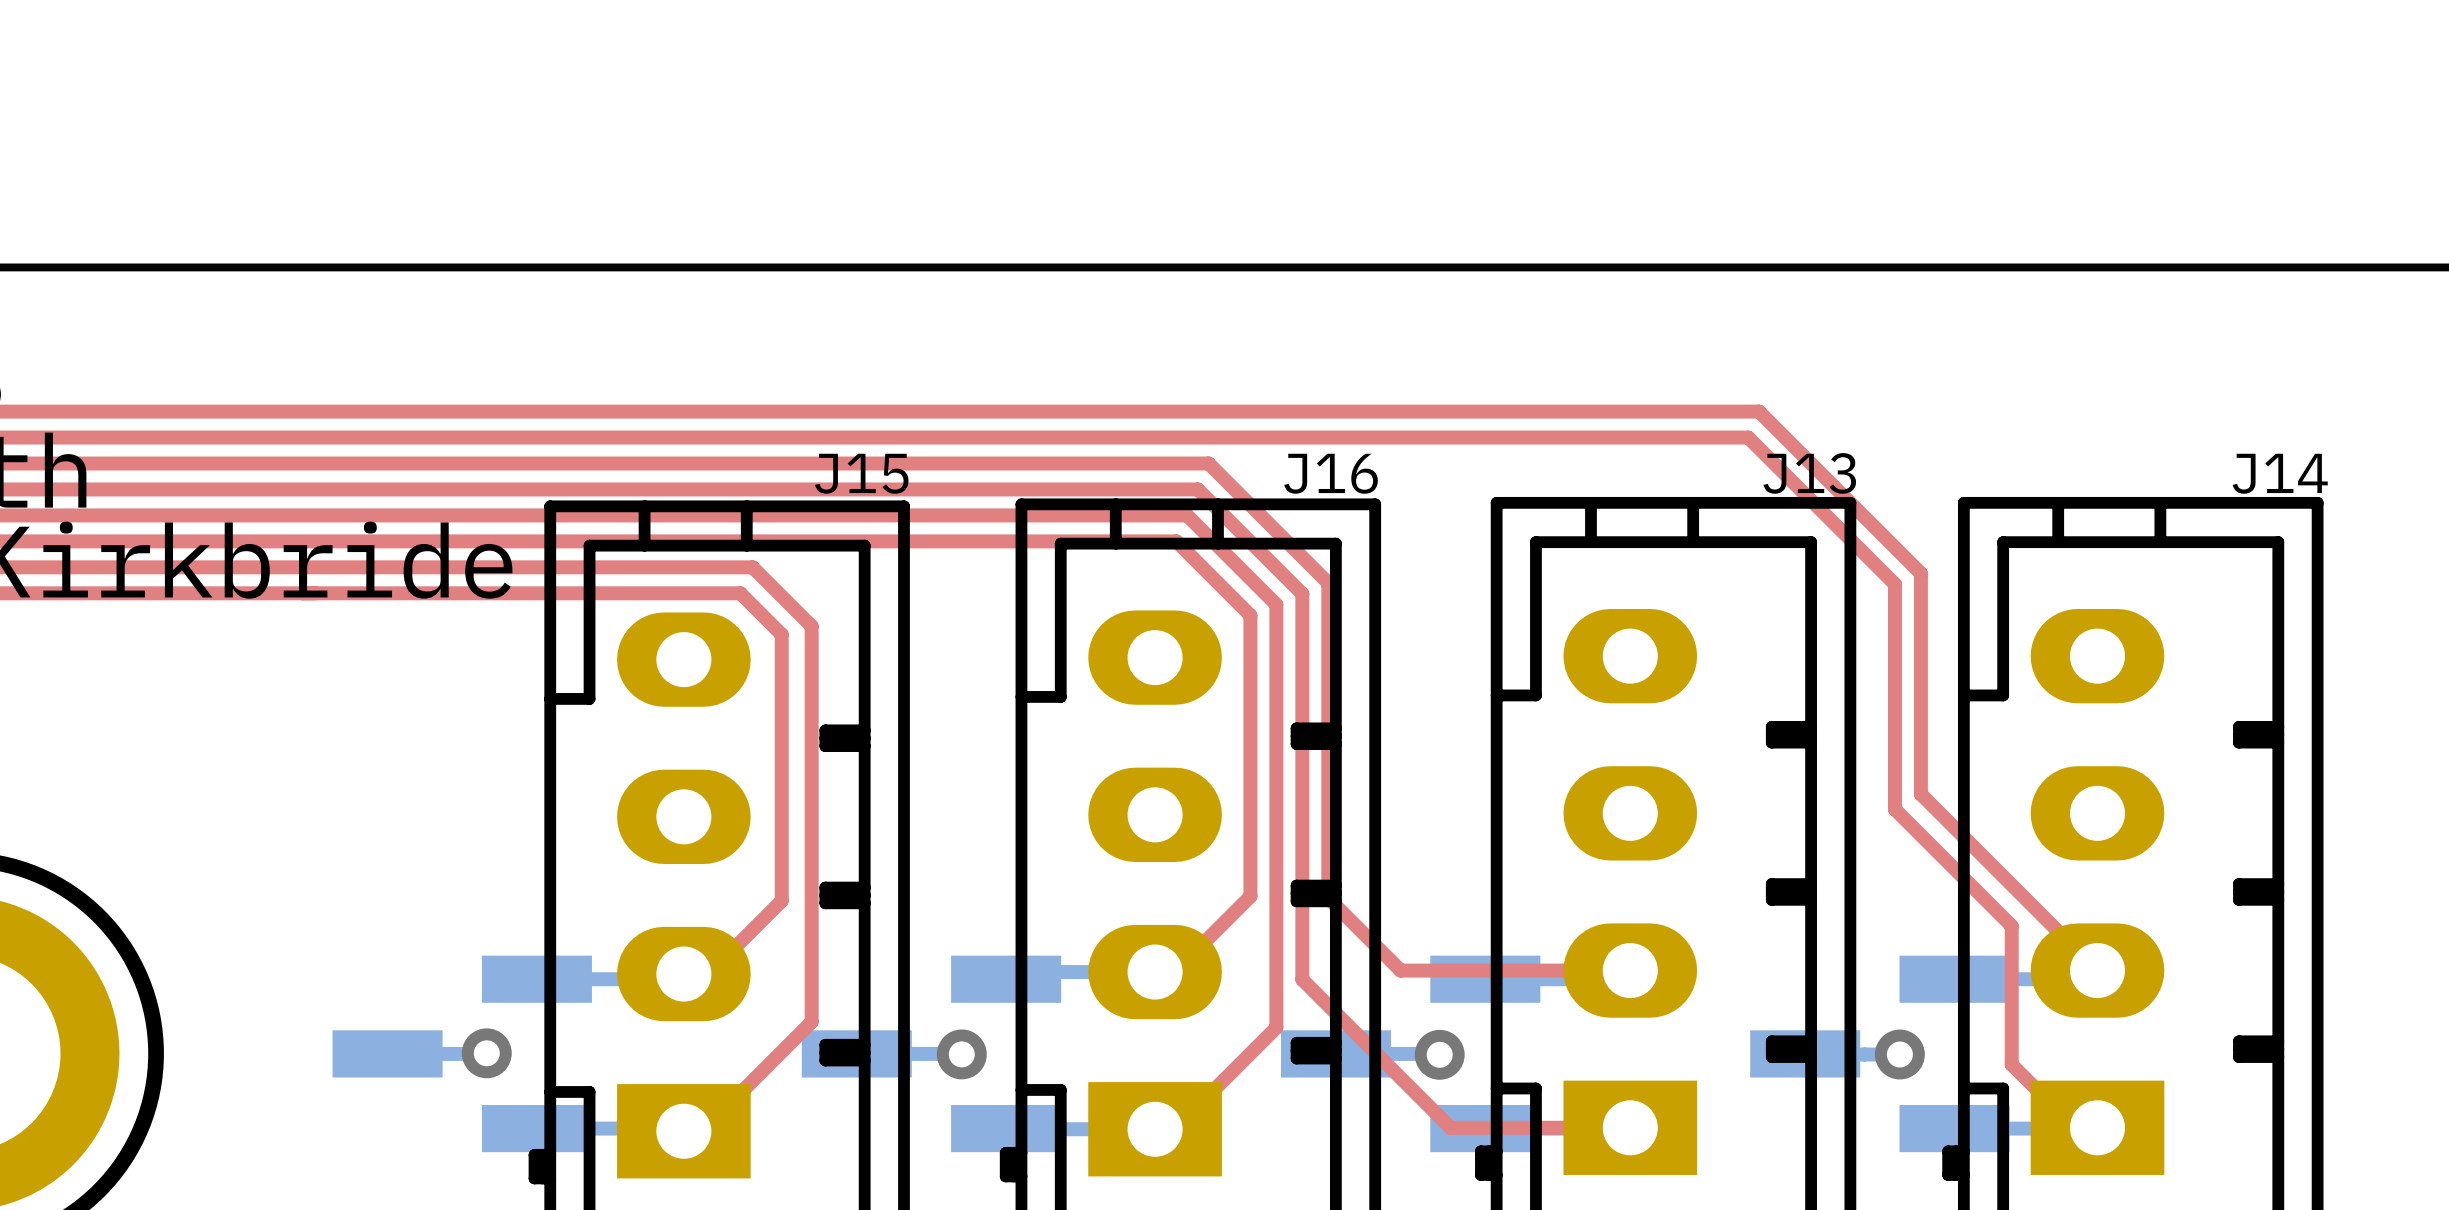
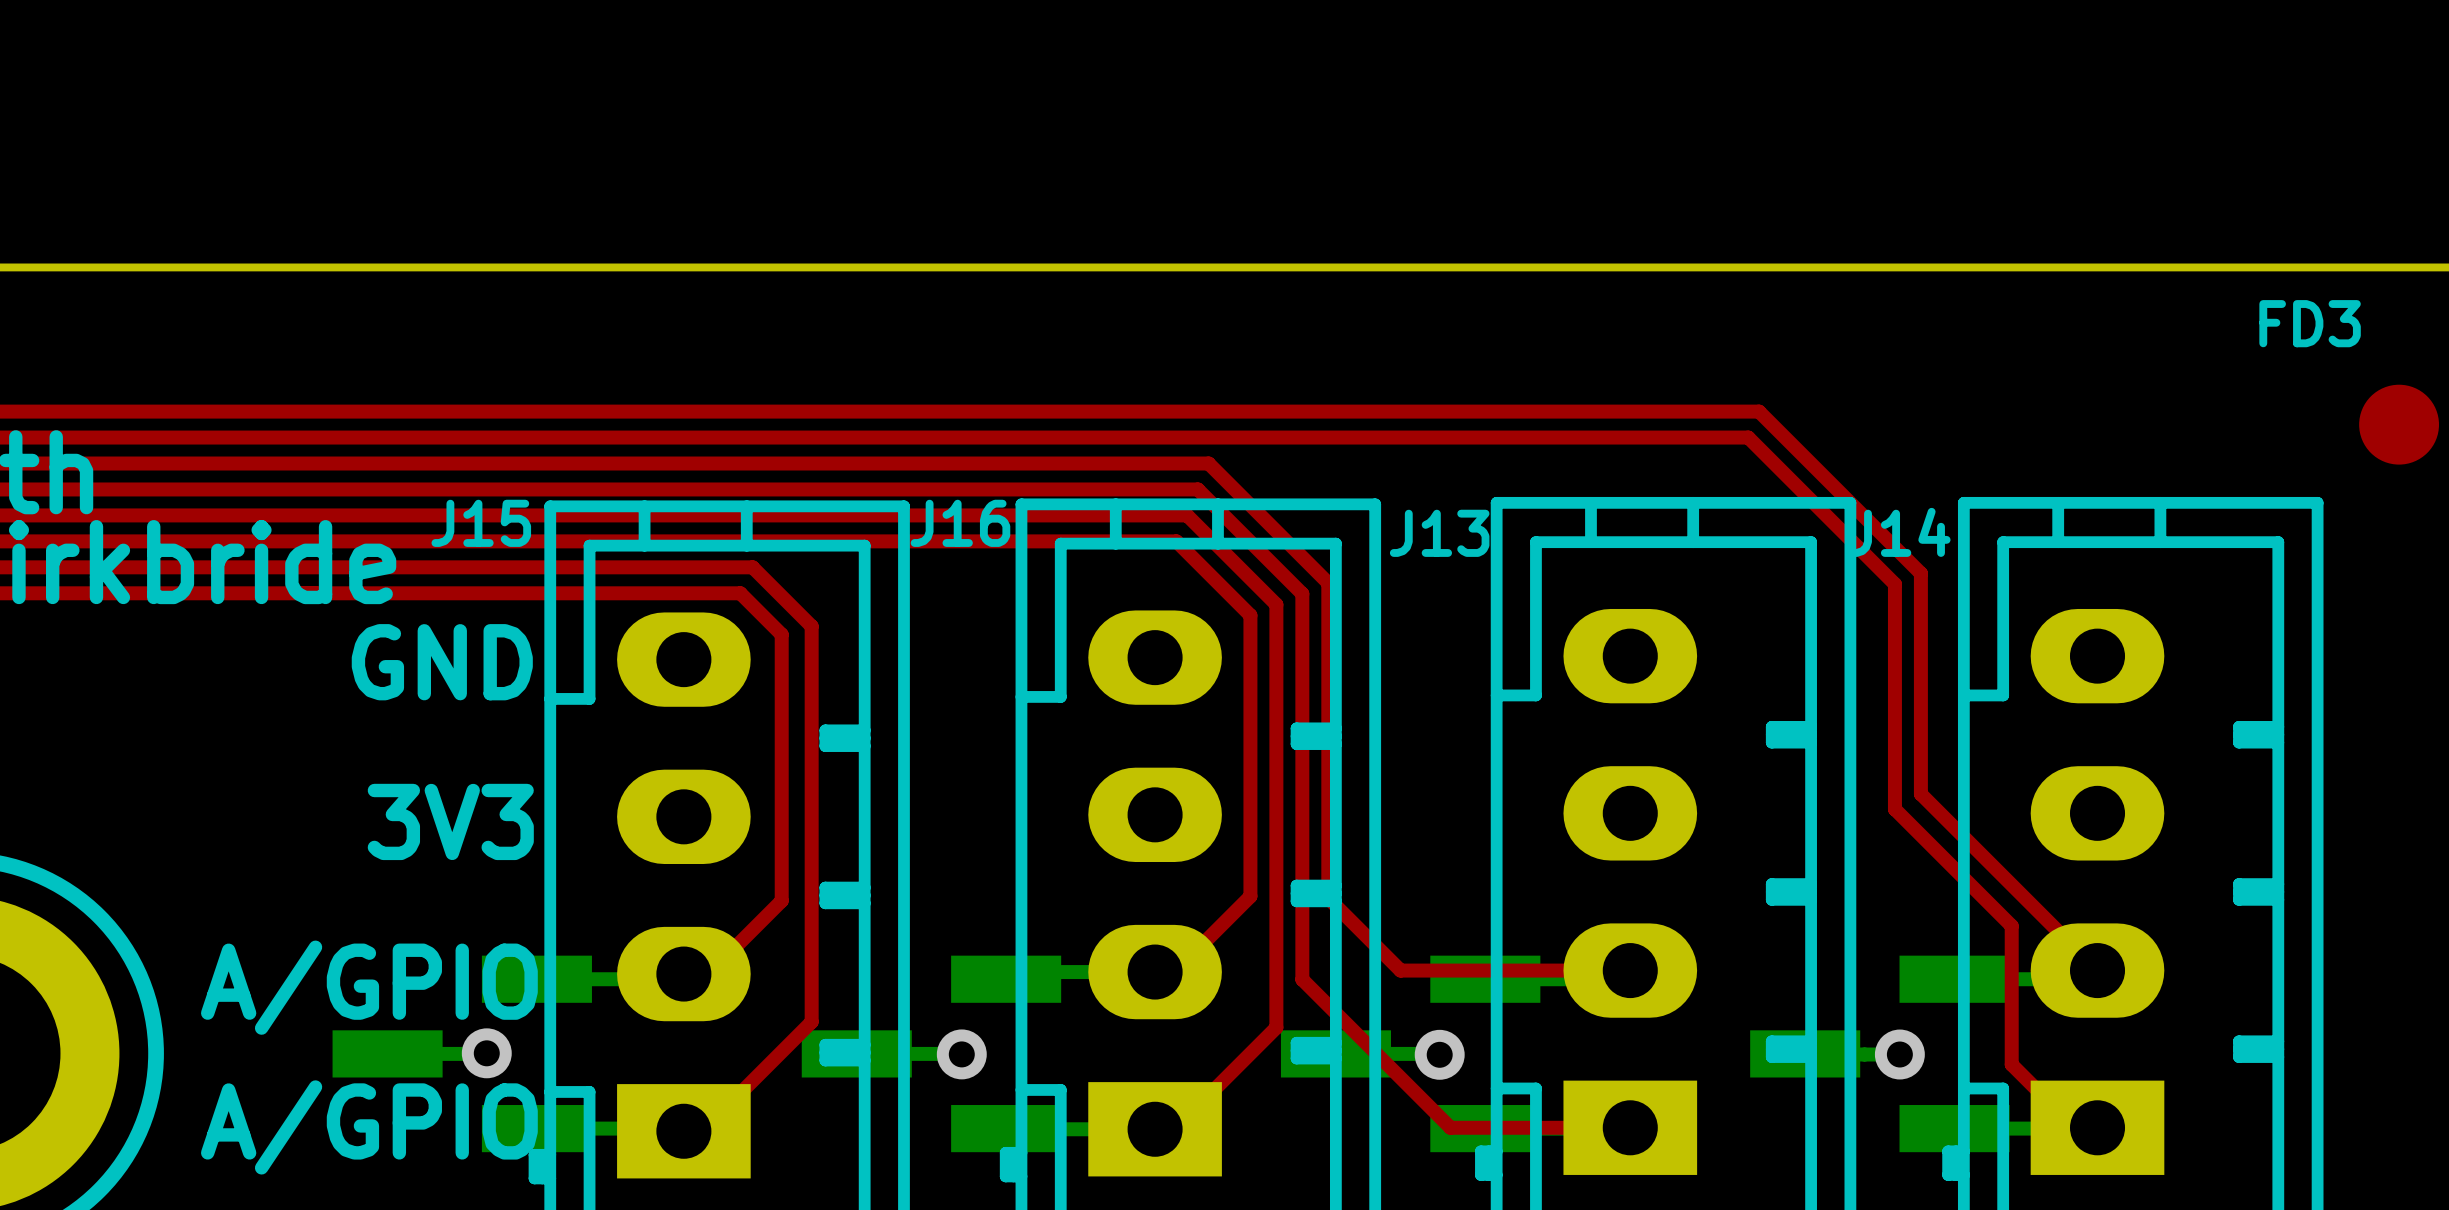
FD3: none -> (2399, 424)
J15 name position: J15 (861, 473) -> J15 (481, 523)
J16 name position: J16 (1331, 473) -> J16 (960, 523)
J13 name position: J13 (1809, 473) -> J13 (1439, 533)
J14 name position: J14 (2280, 473) -> J14 (1899, 532)
text: none -> GND (442, 662)
text: none -> 3V3 (450, 821)
text: none -> A/GPIO (369, 987)
text: none -> A/GPIO (369, 1127)

